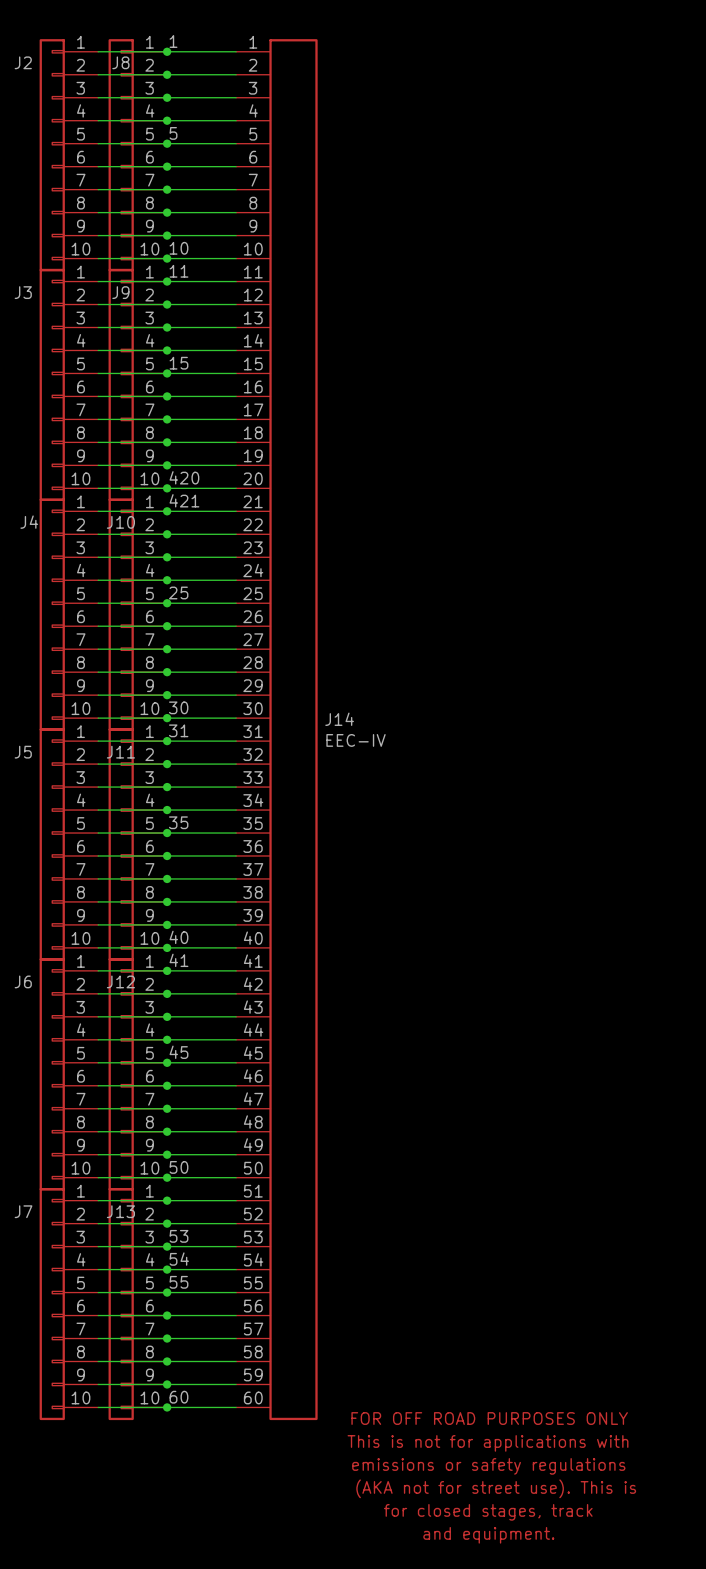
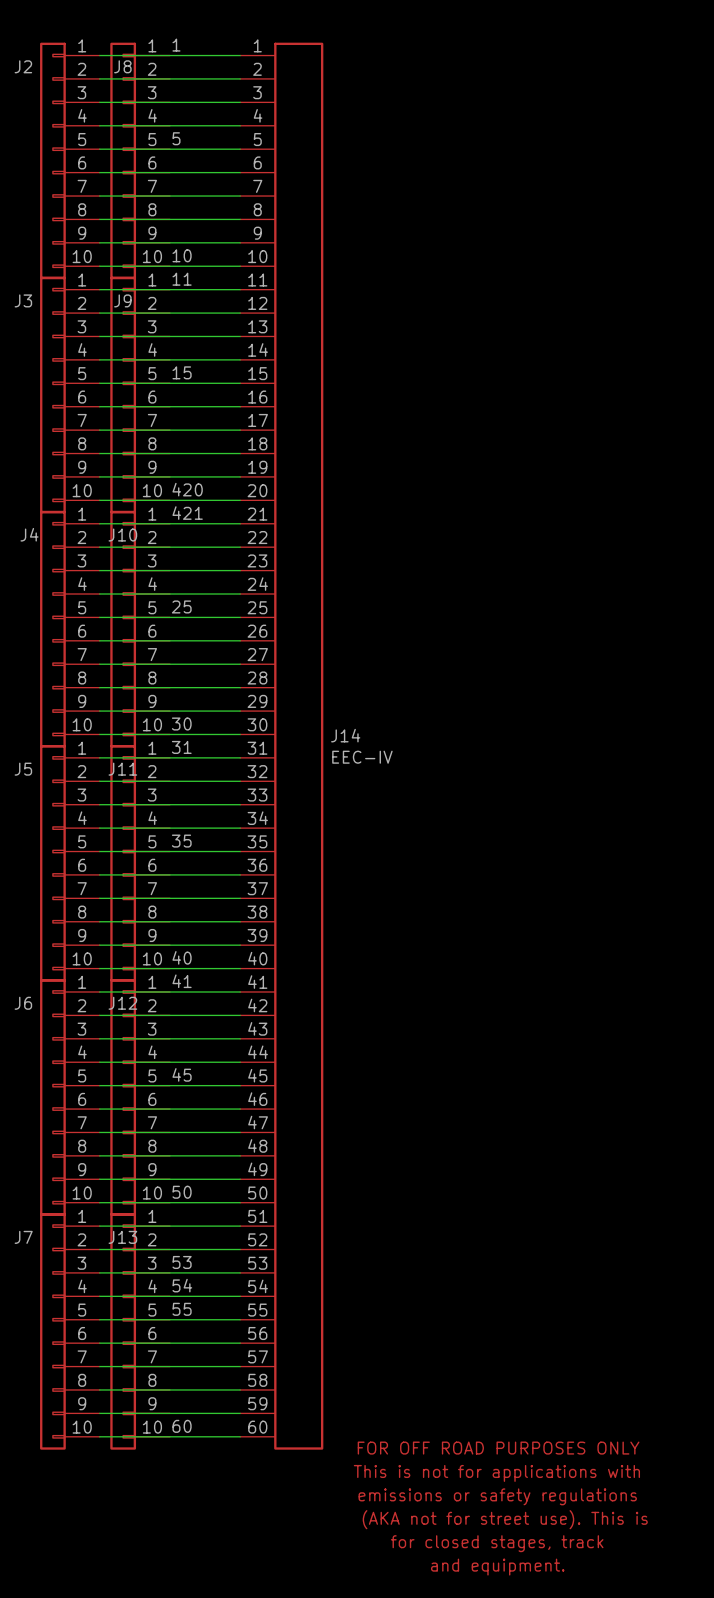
junction: (167, 51) -> none
junction: (167, 74) -> none
junction: (167, 97) -> none
junction: (167, 120) -> none
junction: (167, 143) -> none
junction: (167, 166) -> none
junction: (167, 189) -> none
junction: (167, 212) -> none
junction: (167, 235) -> none
junction: (167, 258) -> none
junction: (167, 281) -> none
junction: (167, 304) -> none
junction: (167, 327) -> none
junction: (167, 350) -> none
junction: (167, 373) -> none
junction: (167, 396) -> none
junction: (167, 419) -> none
junction: (167, 442) -> none
junction: (167, 465) -> none
junction: (167, 488) -> none
junction: (167, 511) -> none
junction: (167, 534) -> none
junction: (167, 557) -> none
junction: (167, 580) -> none
junction: (167, 603) -> none
junction: (167, 626) -> none
junction: (167, 649) -> none
junction: (167, 672) -> none
junction: (167, 695) -> none
junction: (167, 718) -> none
junction: (167, 741) -> none
junction: (167, 764) -> none
junction: (167, 787) -> none
junction: (167, 810) -> none
junction: (167, 833) -> none
junction: (167, 855) -> none
junction: (167, 878) -> none
junction: (167, 901) -> none
junction: (167, 924) -> none
junction: (167, 947) -> none
junction: (167, 970) -> none
junction: (167, 993) -> none
junction: (167, 1016) -> none
junction: (167, 1039) -> none
junction: (167, 1062) -> none
junction: (167, 1085) -> none
junction: (167, 1108) -> none
junction: (167, 1131) -> none
junction: (167, 1154) -> none
junction: (167, 1177) -> none
junction: (167, 1200) -> none
junction: (167, 1223) -> none
junction: (167, 1246) -> none
junction: (167, 1269) -> none
junction: (167, 1292) -> none
junction: (167, 1315) -> none
junction: (167, 1338) -> none
junction: (167, 1361) -> none
junction: (167, 1384) -> none
junction: (167, 1407) -> none

